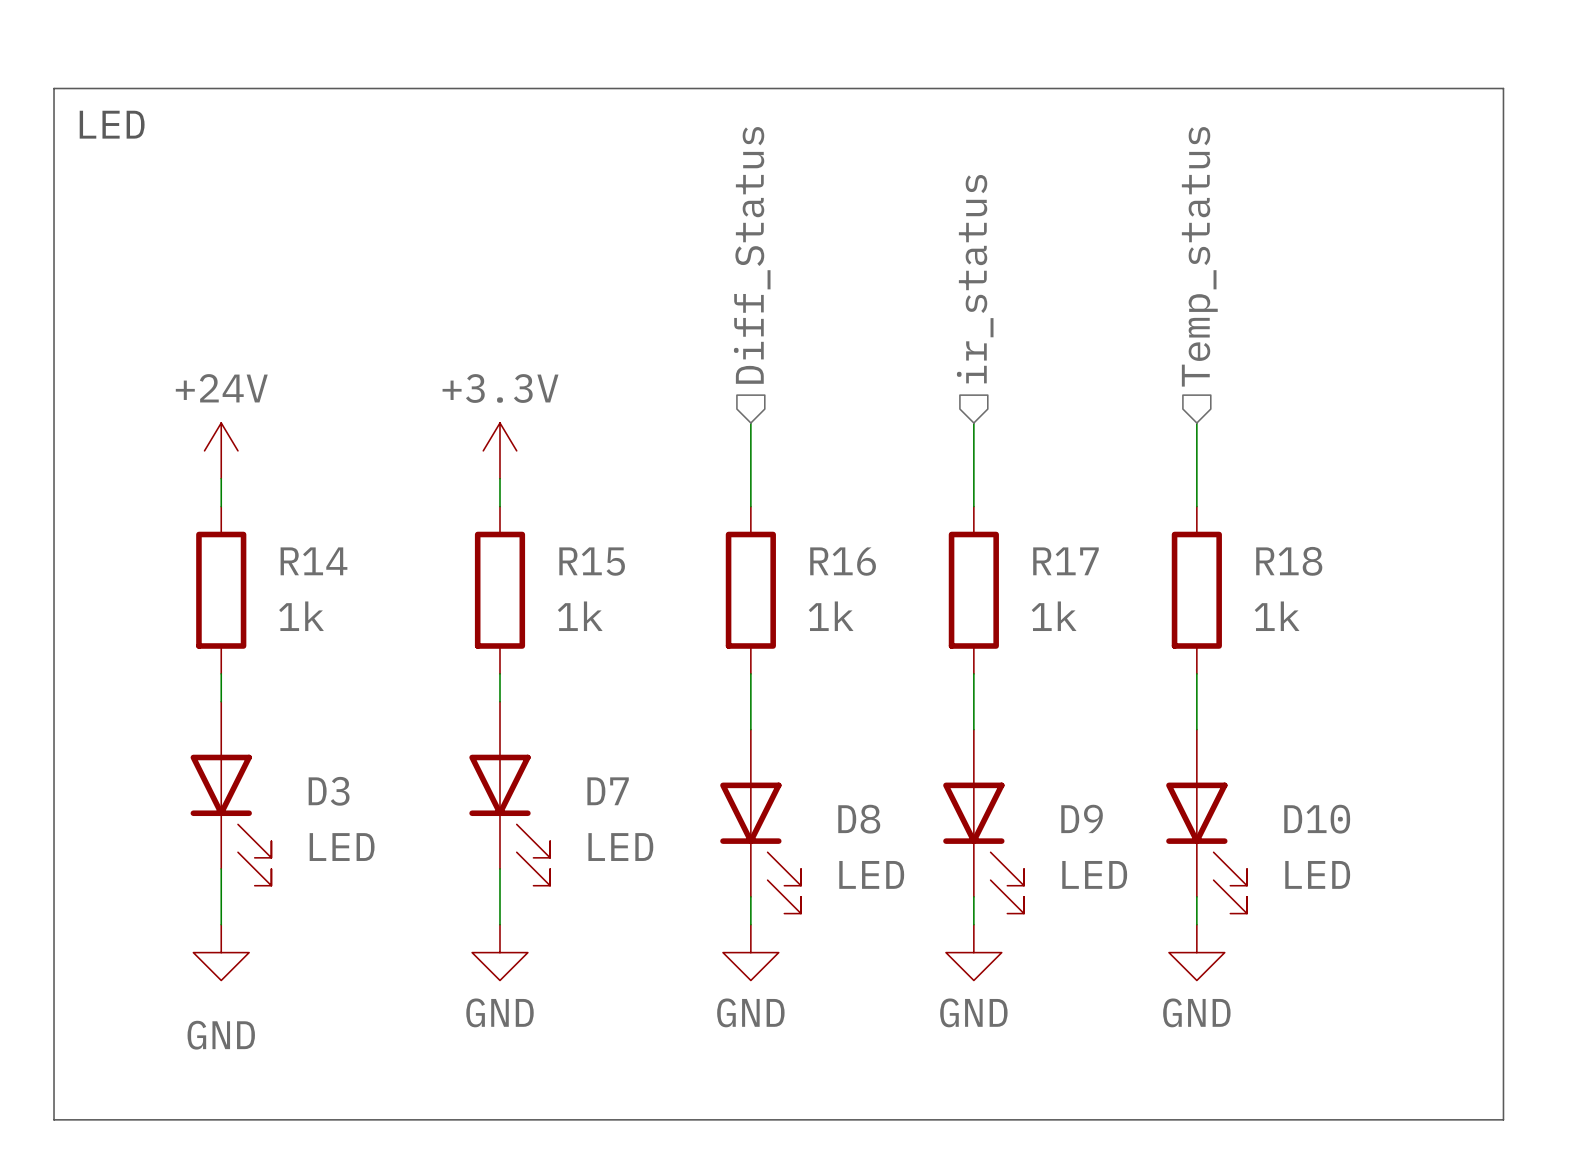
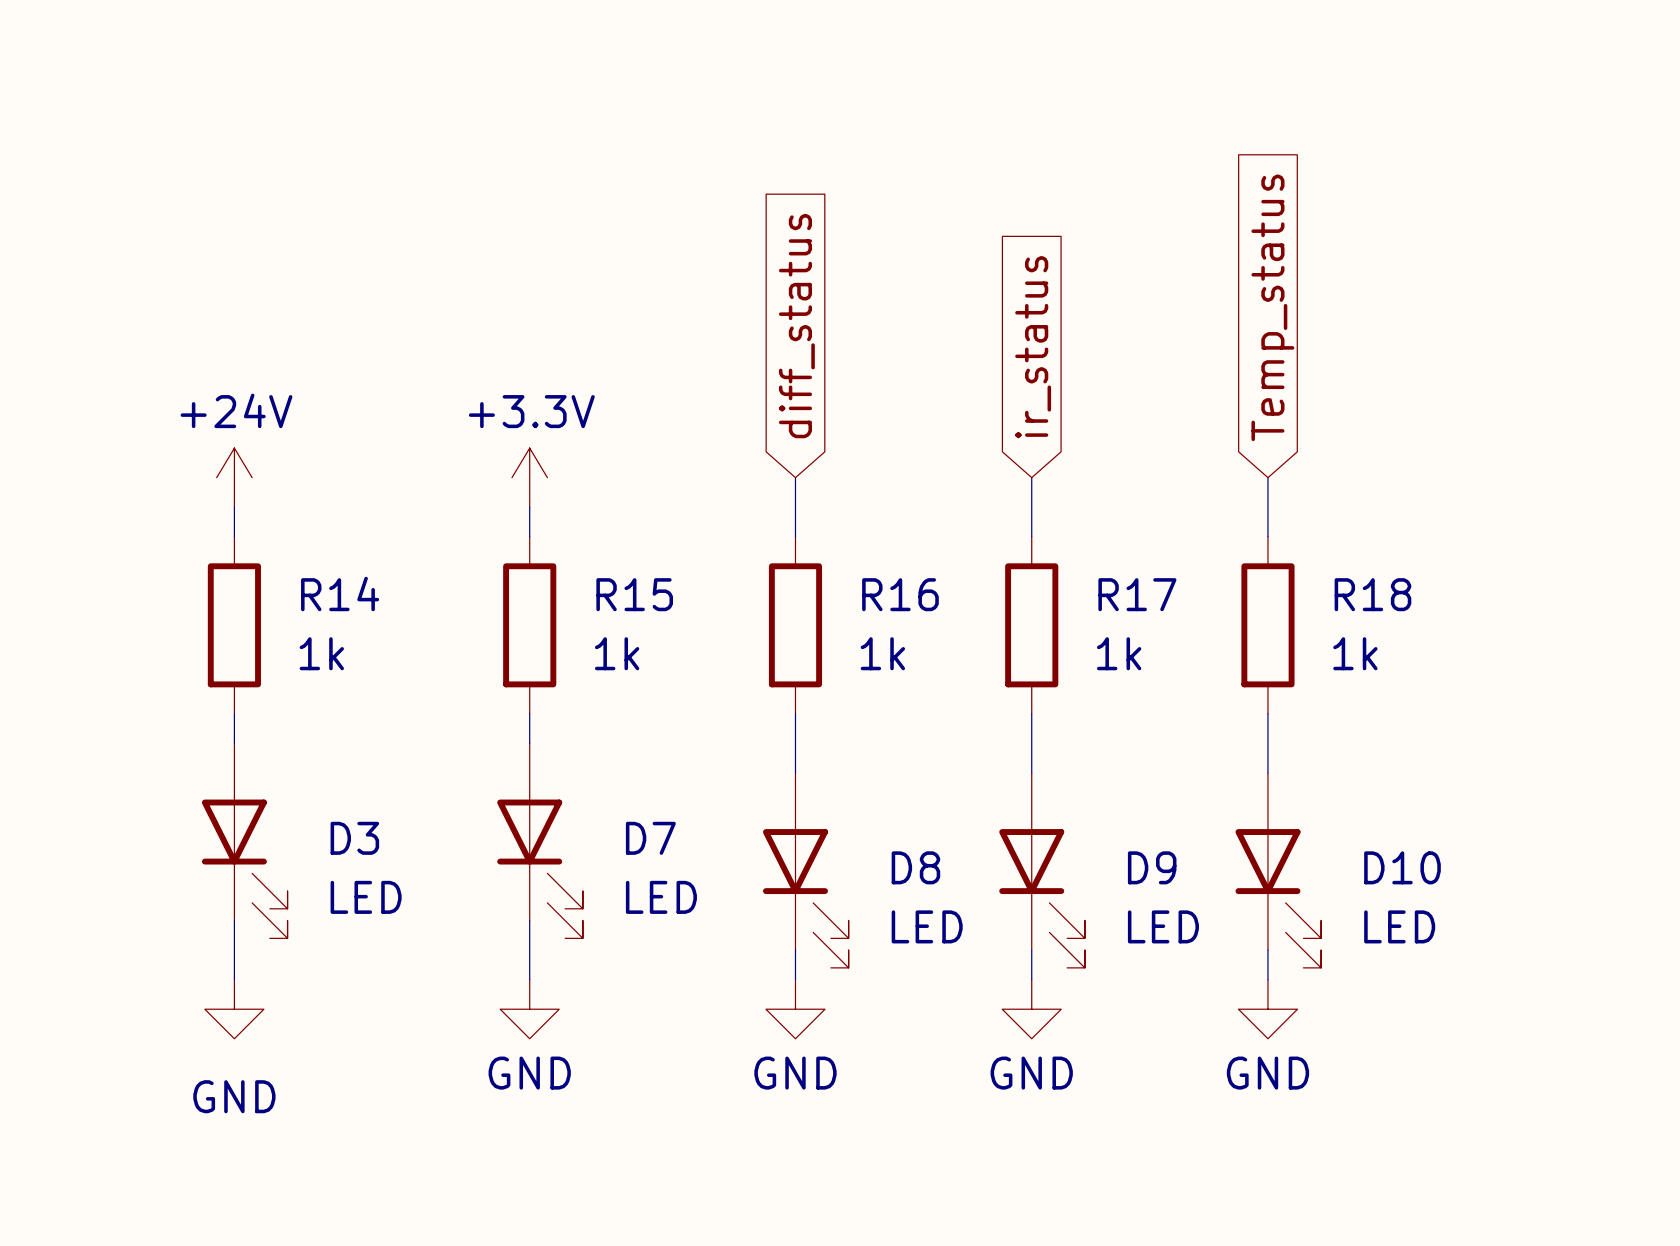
line: (54, 88) (1503, 88) (1503, 1119) (54, 1119) (54, 88) -> none
text: LED (112, 124) -> none
hierarchical label: Diff_Status (752, 255) -> none
hierarchical label: Temp_status (1199, 256) -> none
hierarchical label: ir_status (975, 279) -> none
global label: none -> diff_status (796, 326)
global label: none -> Temp_status (1272, 307)
global label: none -> ir_status (1033, 347)
wire: (750, 423) (750, 450) -> none
wire: (973, 423) (973, 450) -> none
wire: (1196, 423) (1196, 450) -> none

